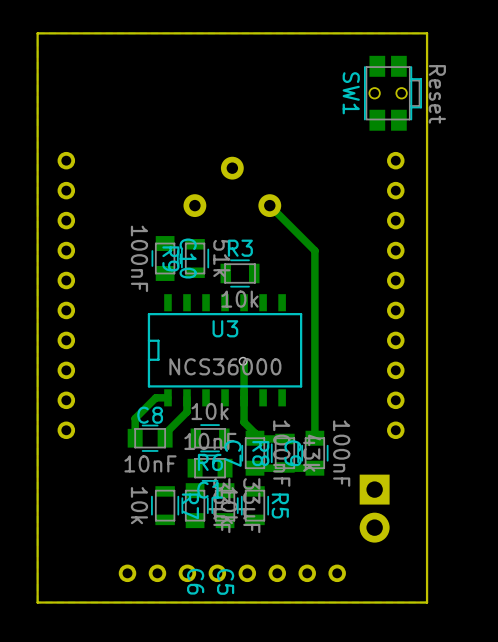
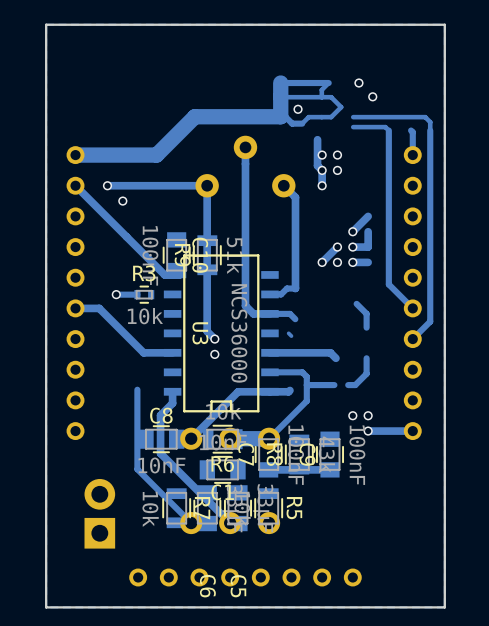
via: none -> (358, 83)
SW1: Reset (392, 93) -> none
track: none -> (280, 96) (331, 97) (341, 107) (331, 117) (308, 117) (302, 123) (292, 123) (285, 116) (280, 116)
via: none -> (372, 96)
track: none -> (321, 97) (321, 89) (328, 83) (280, 83) (280, 116)
via: none -> (298, 109)
track: none -> (280, 116) (194, 116) (156, 155) (75, 155)
track: none -> (353, 117) (425, 117) (430, 122) (430, 321) (412, 339)
track: none -> (353, 127) (385, 127) (388, 130) (388, 284) (412, 308)
track: none -> (411, 130) (412, 132) (412, 155)
track: none -> (317, 139) (317, 165) (322, 170) (322, 185)
track: none -> (245, 147) (245, 305) (253, 313) (290, 313) (295, 319)
via: none -> (322, 155)
via: none -> (337, 155)
via: none -> (322, 170)
via: none -> (337, 170)
part position: (232, 186) -> (245, 166)
track: none -> (75, 185) (164, 274) (172, 274)
track: none -> (107, 185) (207, 185) (207, 331) (214, 339)
via: none -> (107, 185)
track: none -> (283, 185) (295, 197) (295, 288)
via: none -> (322, 185)
via: none -> (122, 201)
track: (269, 205) (314, 250) (314, 438) -> none
track: none -> (368, 216) (352, 231)
via: none -> (352, 231)
track: none -> (368, 231) (368, 247) (352, 247)
track: none -> (337, 247) (322, 262)
via: none -> (337, 247)
via: none -> (352, 247)
R3 footprint: [220, 259, 260, 288] -> [134, 285, 155, 304]
via: none -> (322, 262)
via: none -> (337, 262)
via: none -> (352, 262)
track: none -> (368, 262) (352, 262)
track: none -> (295, 288) (286, 288) (281, 294) (269, 294)
via: none -> (116, 294)
track: none -> (137, 294) (116, 294)
track: none -> (356, 303) (366, 313) (366, 327)
track: none -> (75, 308) (99, 308) (143, 352) (172, 352)
track: none -> (288, 333) (291, 336)
via: none -> (214, 339)
U3 rotation: 0° (225, 350) -> 90° counterclockwise (221, 333)
track: none -> (309, 351) (269, 352) (330, 352) (335, 358)
via: none -> (214, 354)
track: none -> (366, 358) (366, 373) (355, 385) (348, 385)
track: (243, 361) (244, 422) (254, 433) (255, 438) (284, 438) -> none
via: (243, 361) -> none
track: none -> (269, 372) (302, 372) (306, 376) (306, 401) (269, 438) (230, 438)
track: none -> (334, 385) (306, 385)
track: none -> (137, 389) (137, 469) (191, 523)
track: none -> (289, 390) (238, 391) (191, 438)
track: none -> (172, 391) (172, 403) (160, 415) (160, 453) (230, 523)
track: (167, 397) (155, 397) (135, 418) (134, 438) -> none
track: (186, 397) (186, 412) (165, 433) (165, 438) -> none
via: none -> (352, 415)
via: none -> (368, 415)
via: none -> (368, 431)
track: none -> (412, 431) (368, 431)
part: none -> (230, 438)
part rotation: 0° (374, 508) -> 180° (99, 513)
part position: (374, 508) -> (99, 513)
part: none -> (230, 523)

